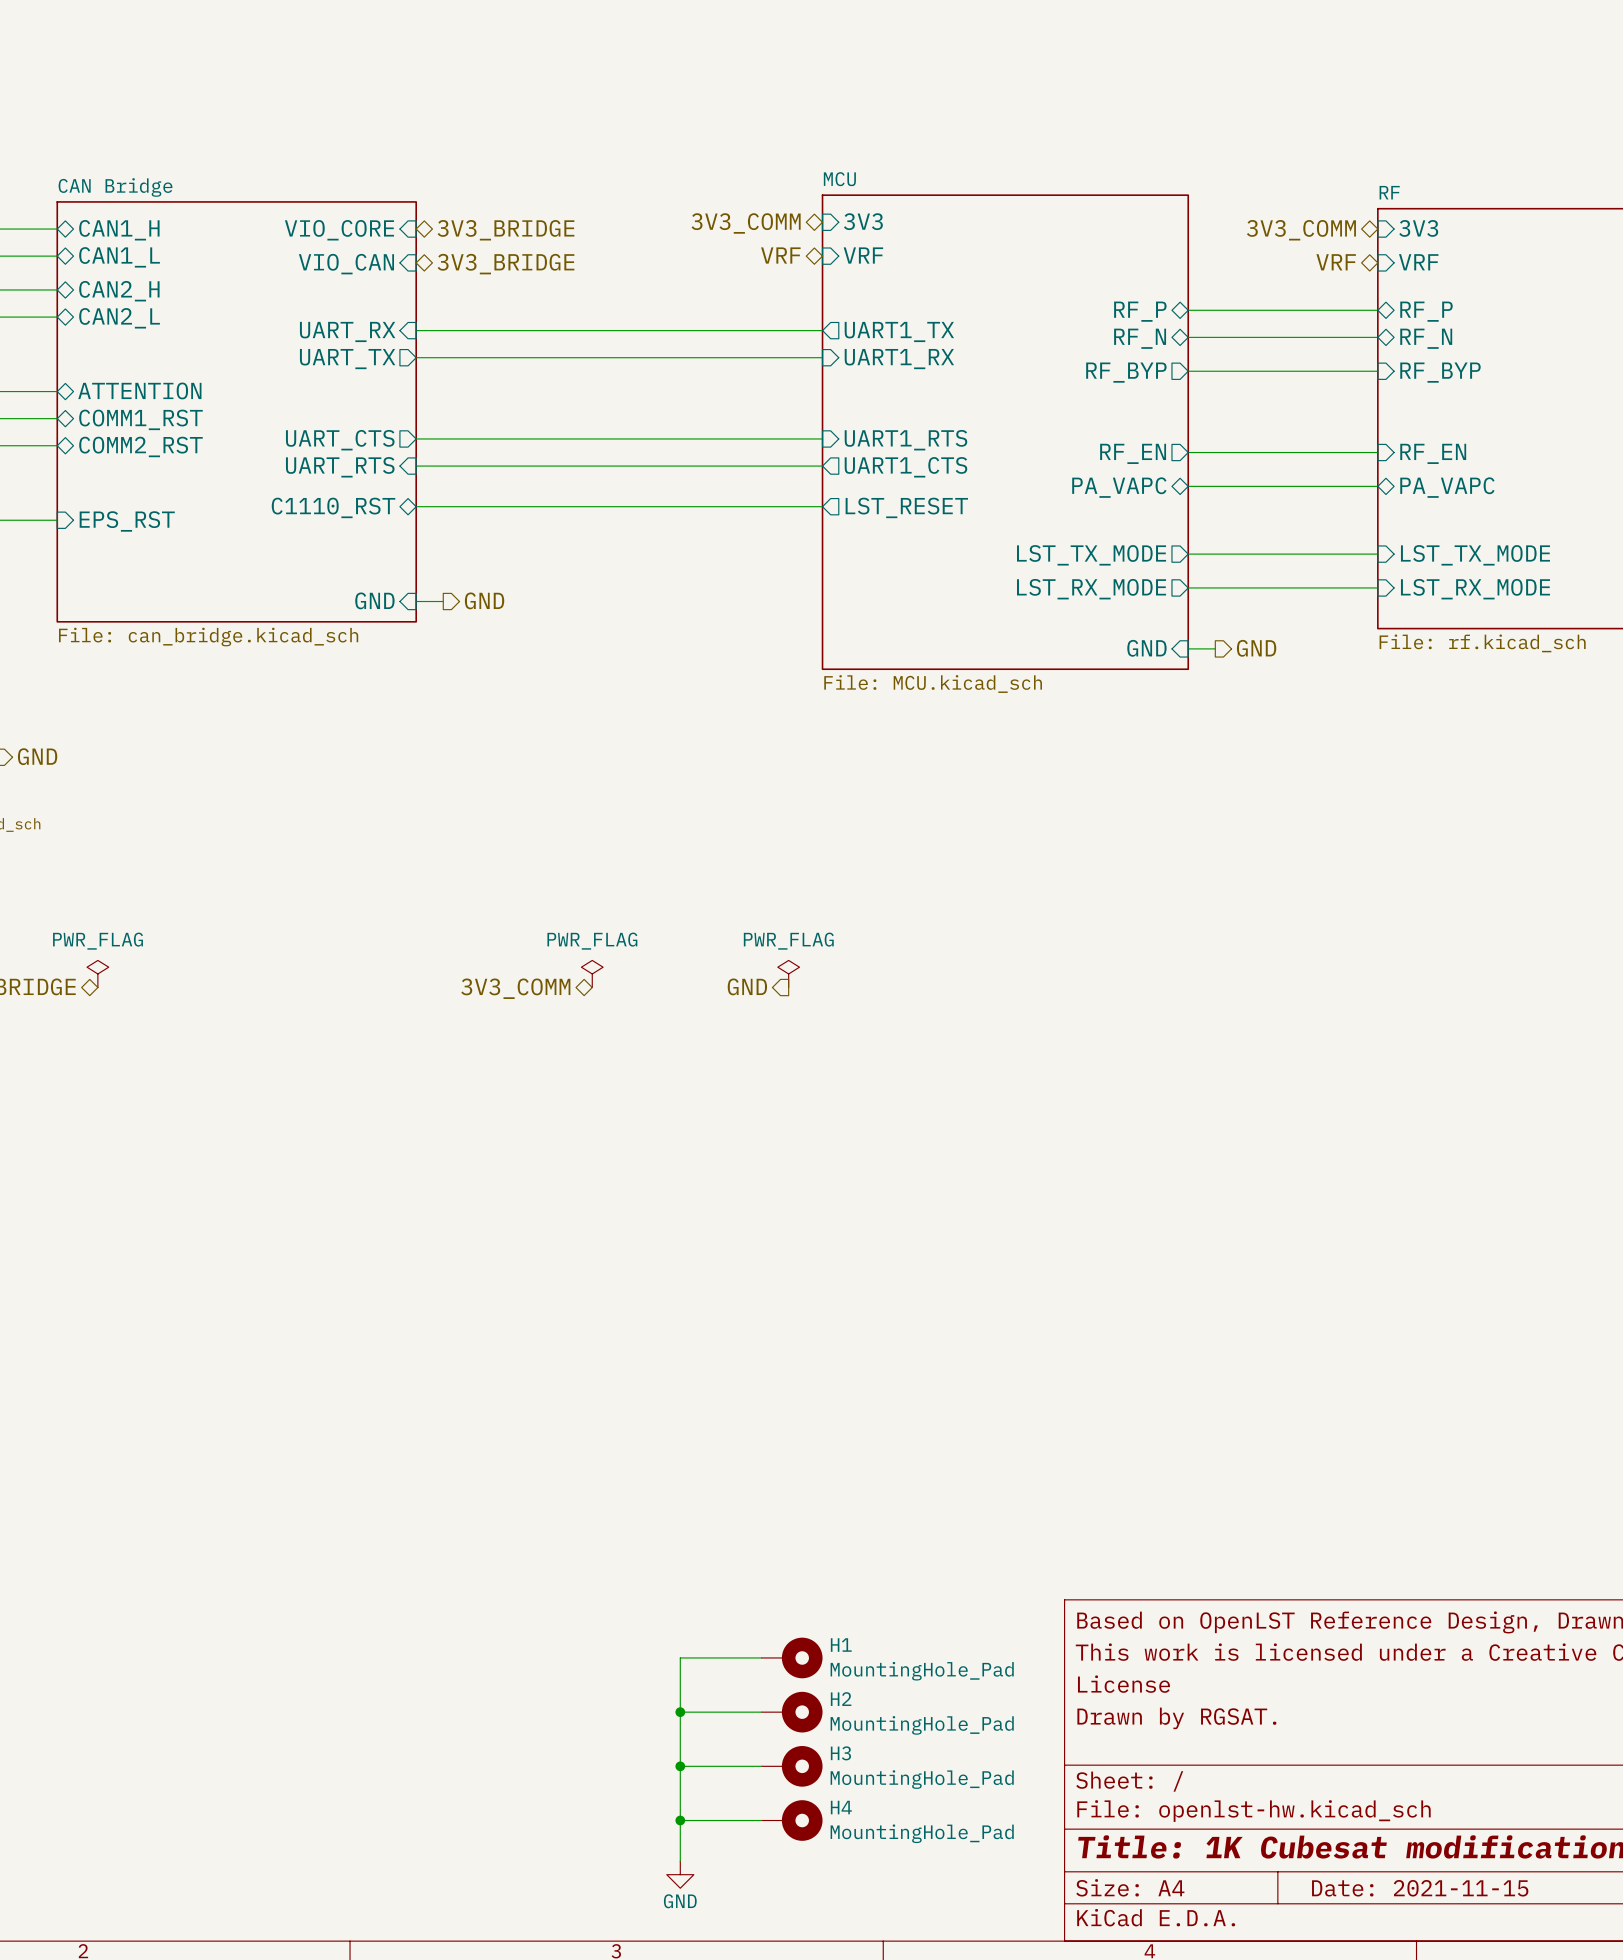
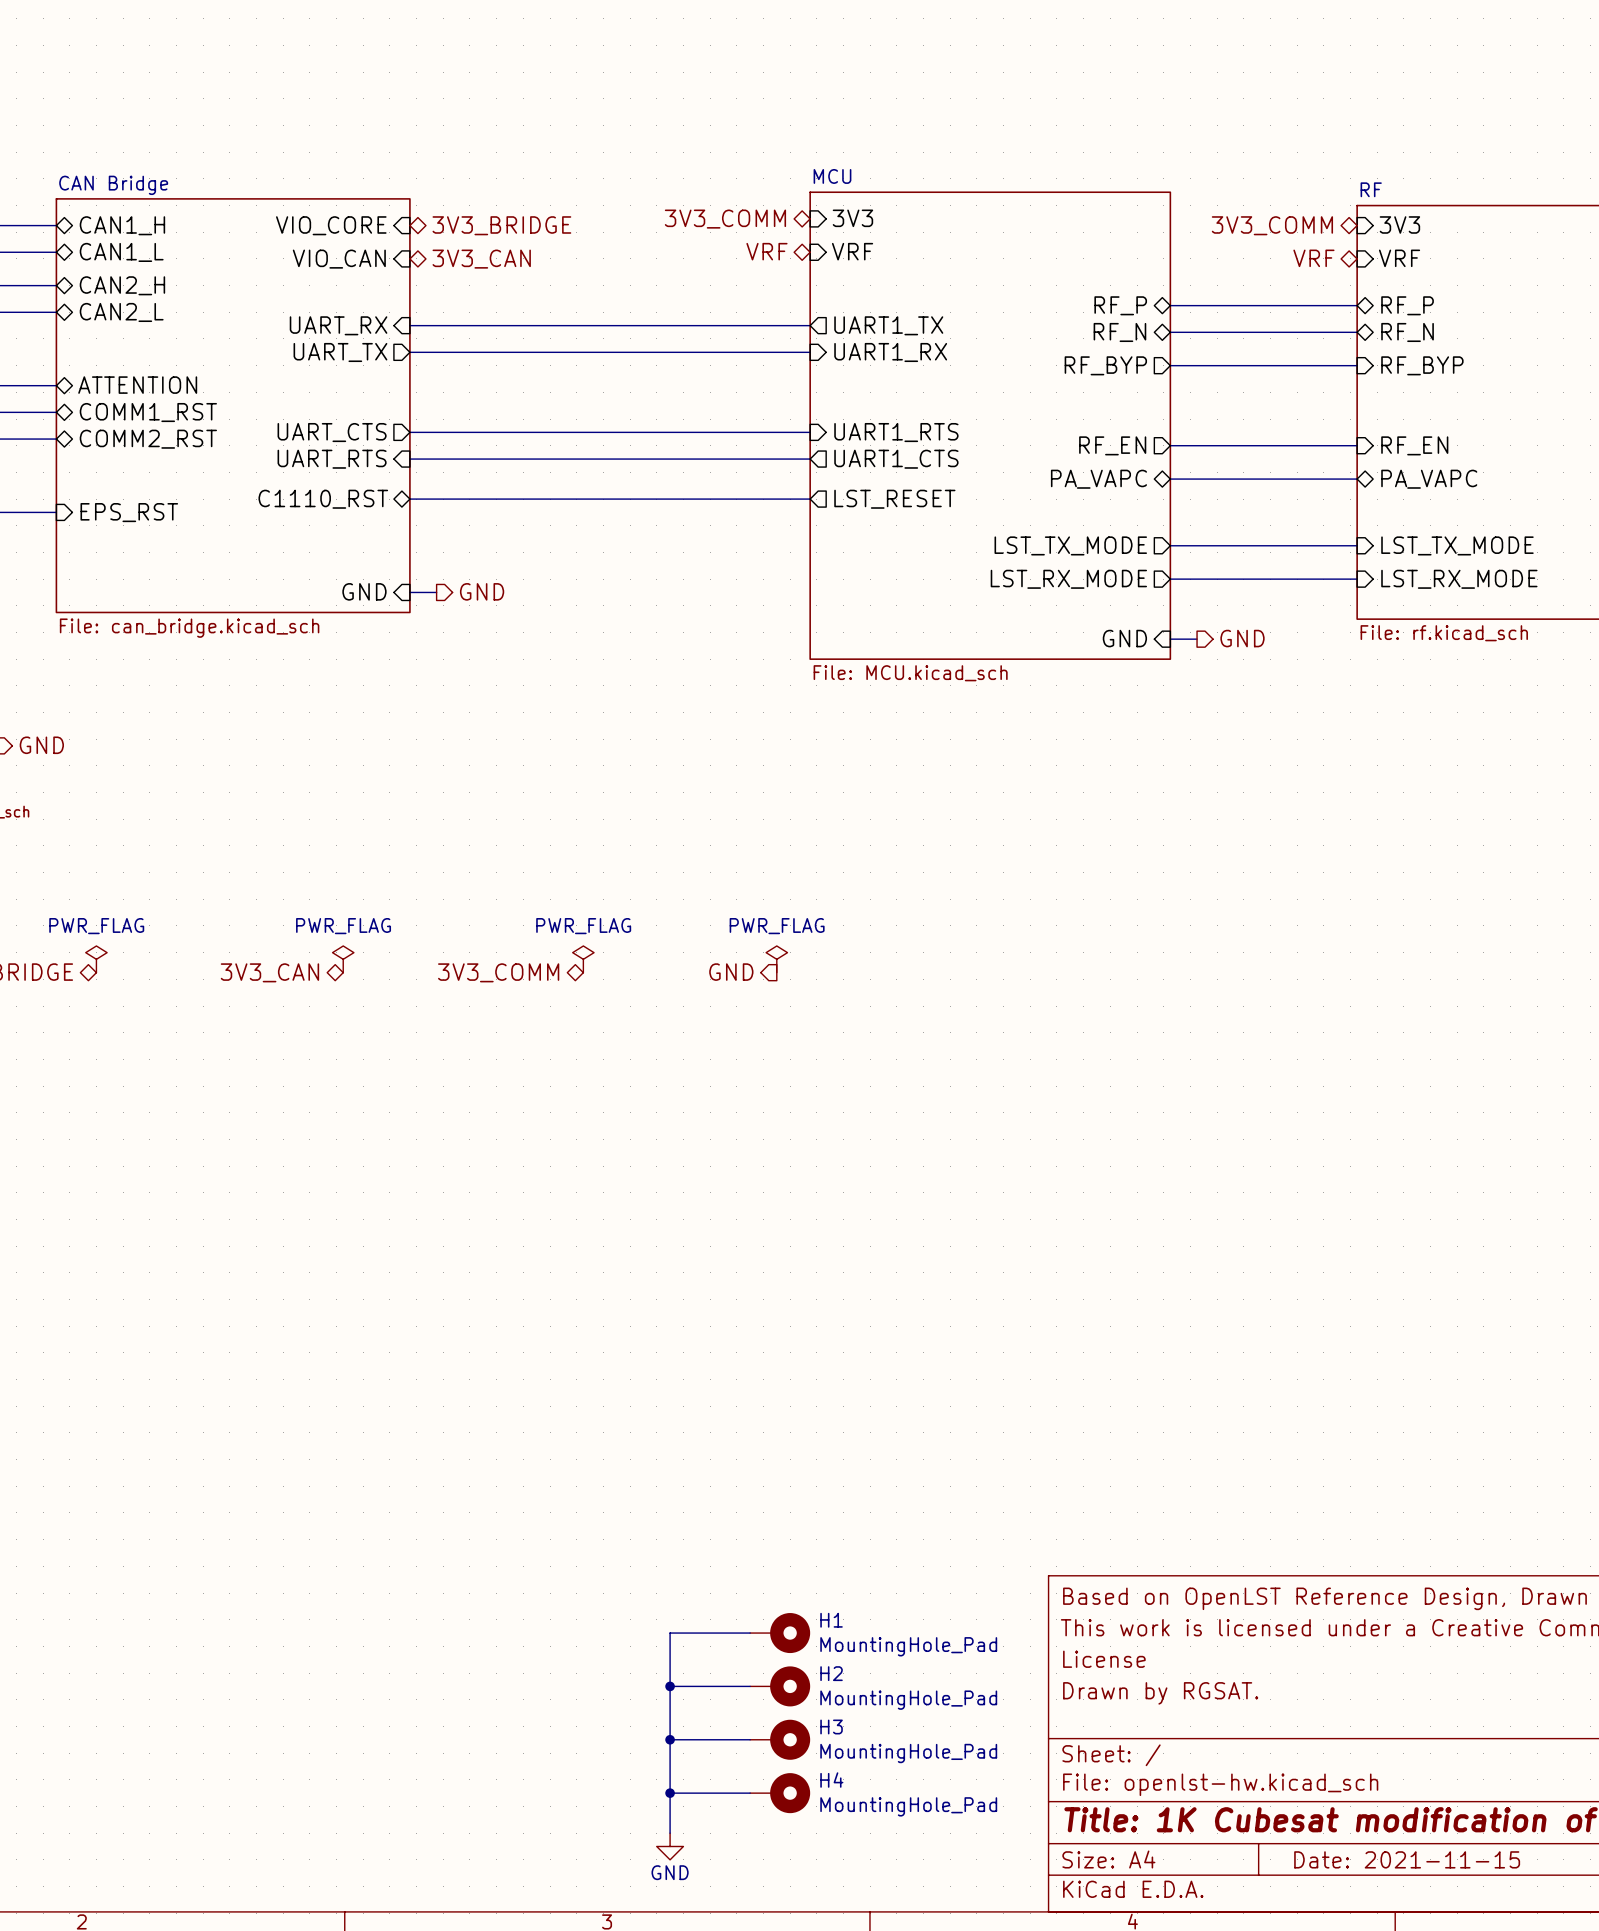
hierarchical label: 3V3_BRIDGE (505, 264) -> 3V3_CAN (481, 259)
power symbol: none -> PWR_FLAG (343, 959)
hierarchical label: none -> 3V3_CAN (269, 972)

